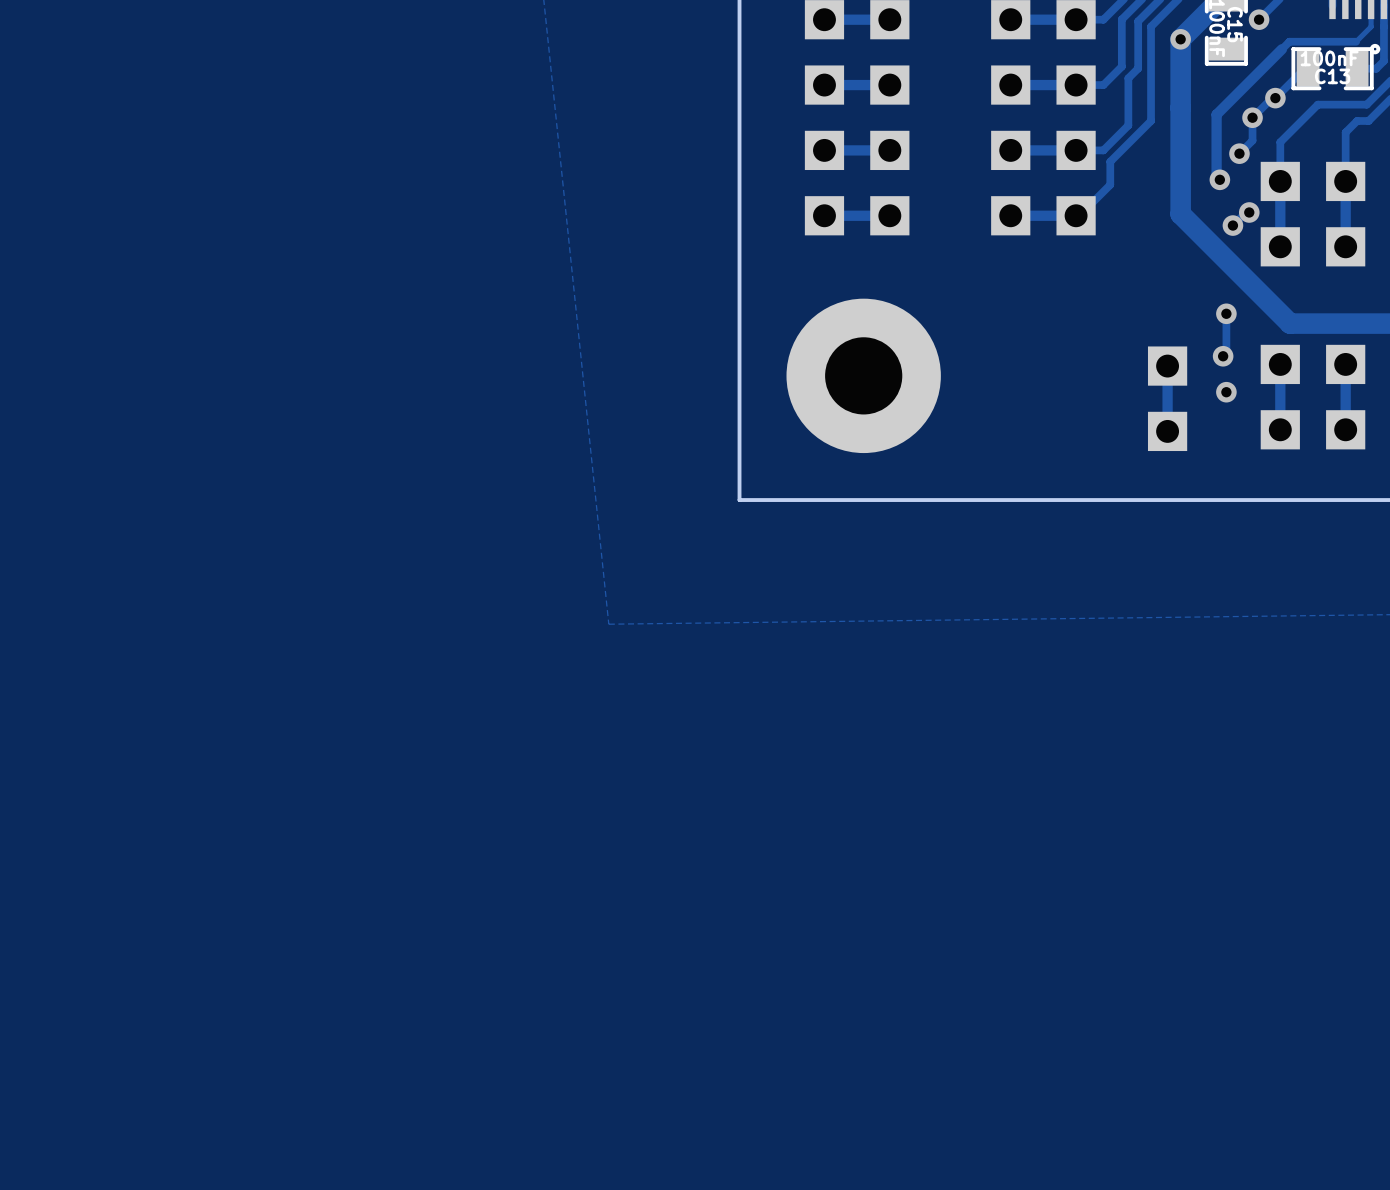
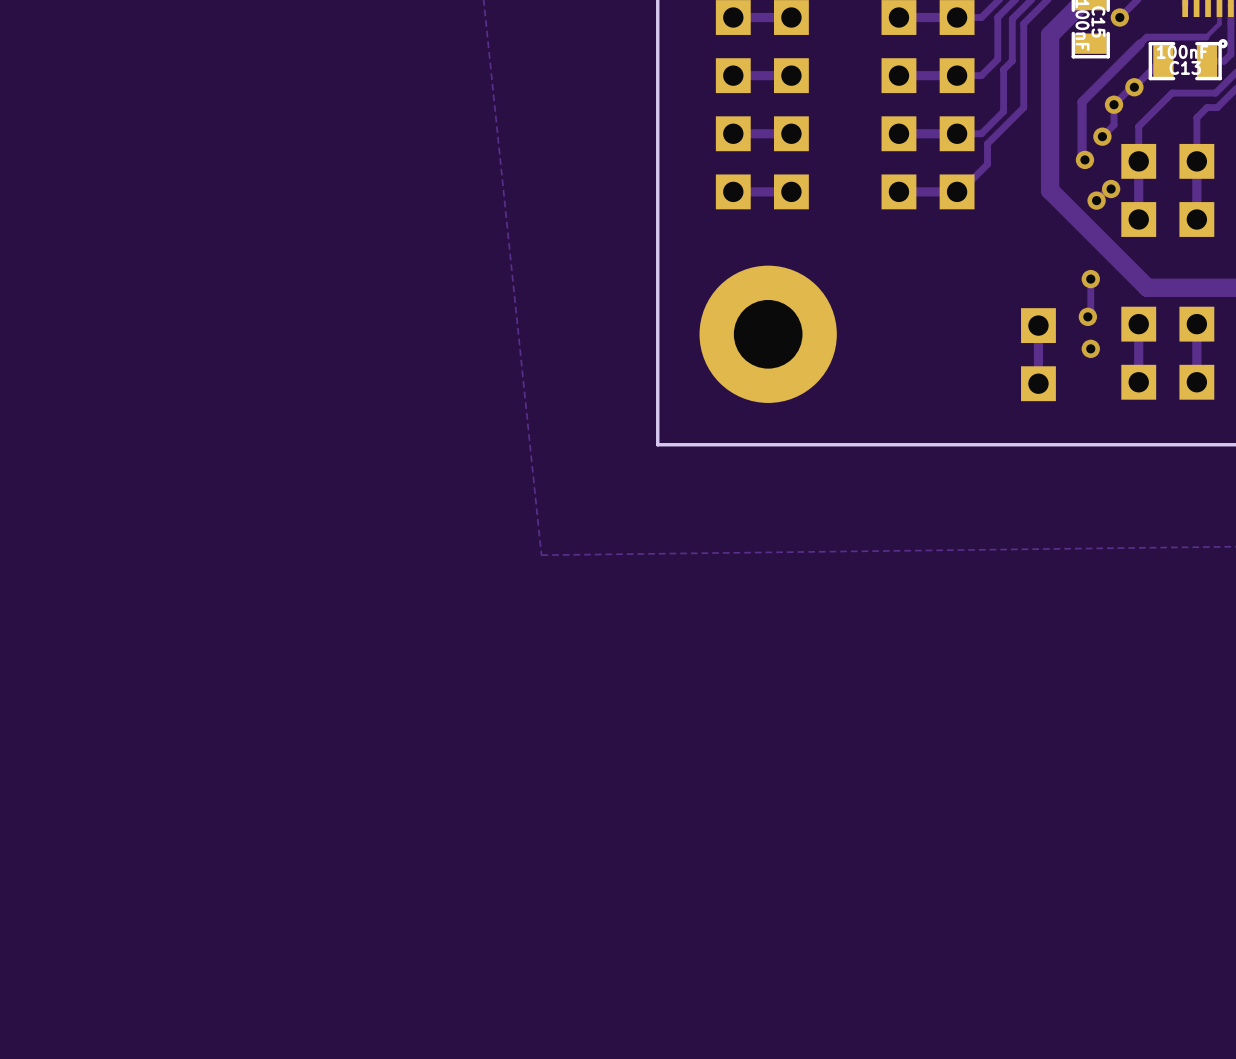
via: (1180, 39) -> none

